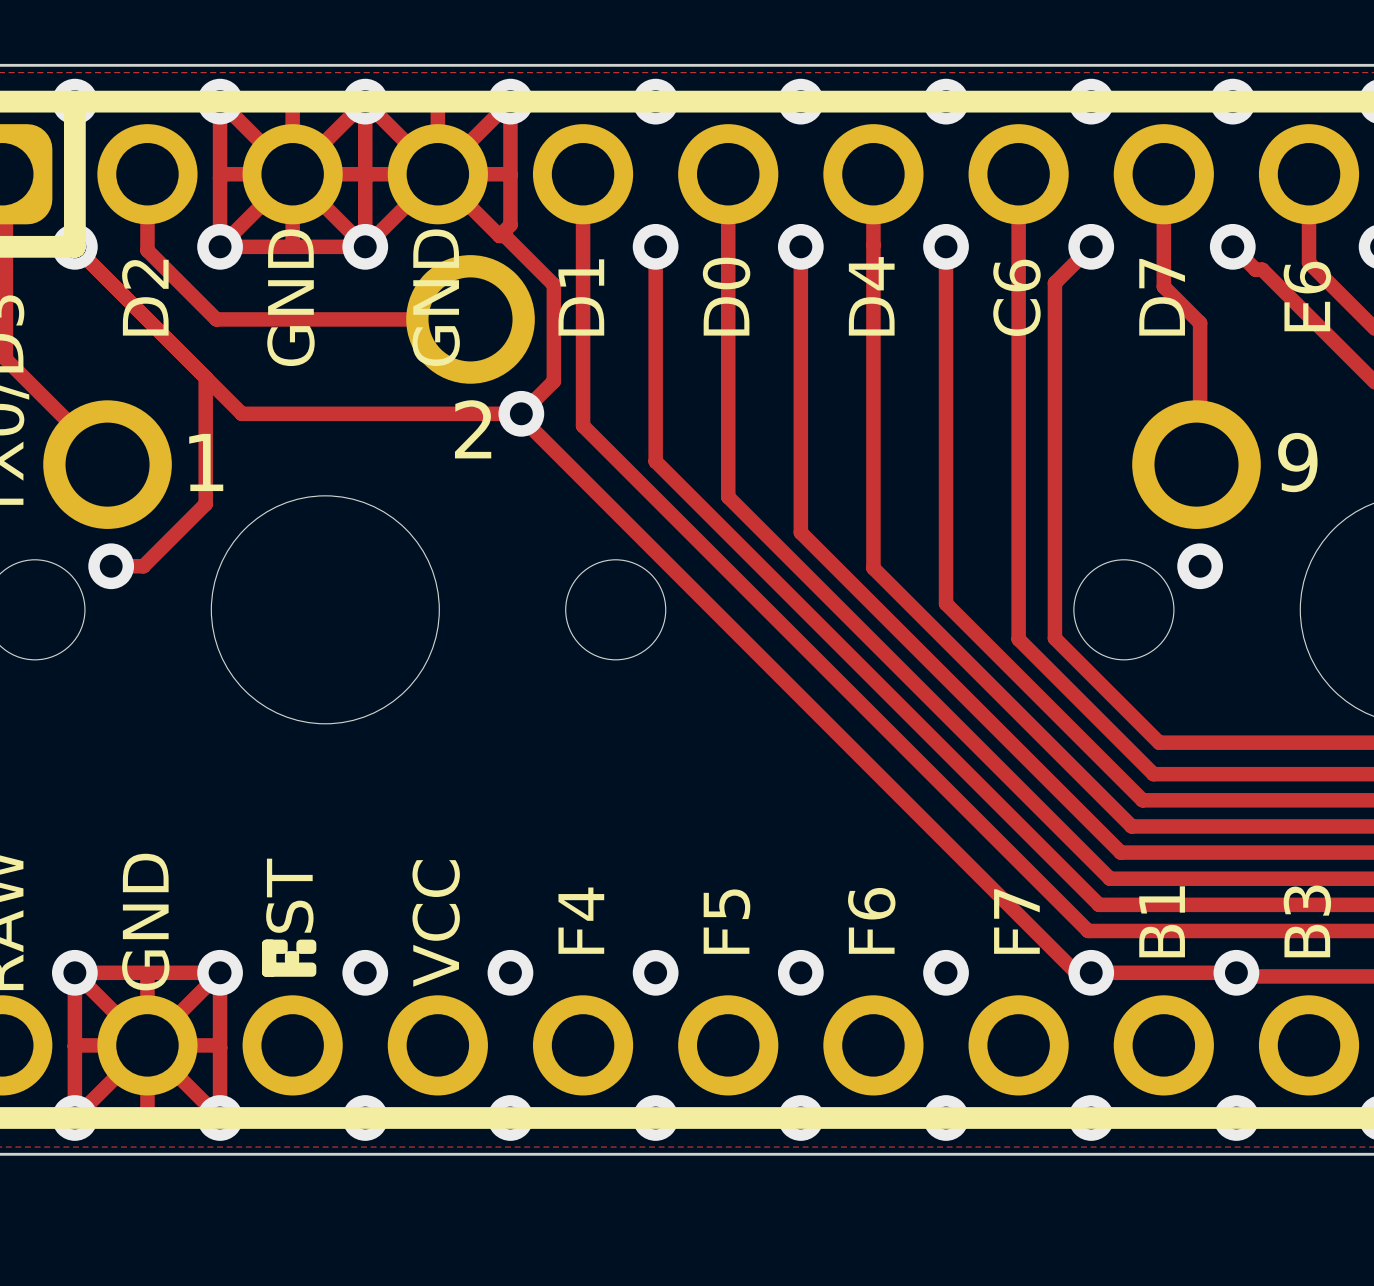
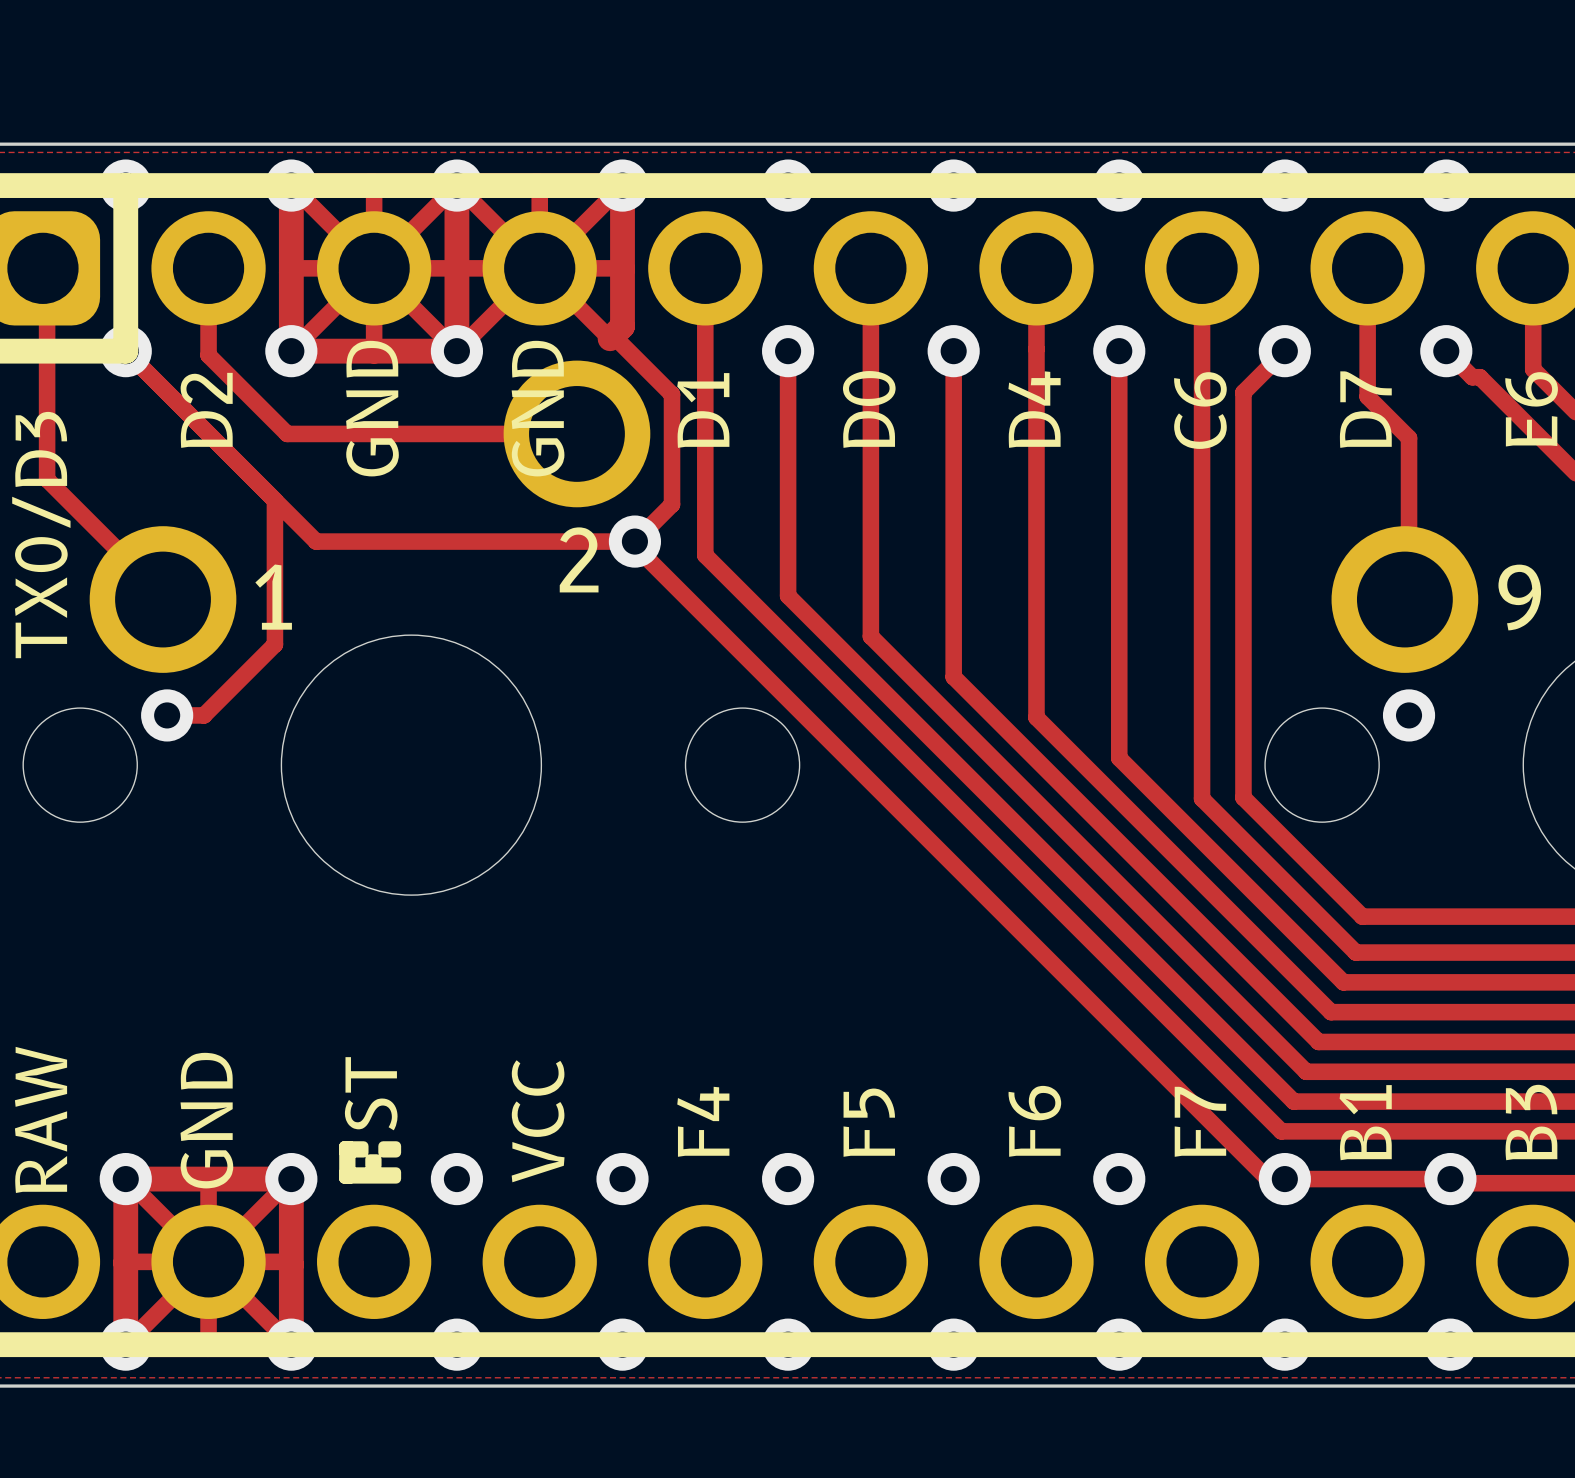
track width: thin (365, 101) (365, 246) (220, 246) (220, 101) (510, 101) (510, 225) (499, 235) -> thick (456, 185) (456, 351) (291, 351) (291, 185) (622, 185) (622, 326) (610, 338)
track width: thin (74, 972) (74, 1117) (220, 1117) (220, 972) (74, 972) -> thick (125, 1179) (125, 1344) (291, 1344) (291, 1179) (125, 1179)

